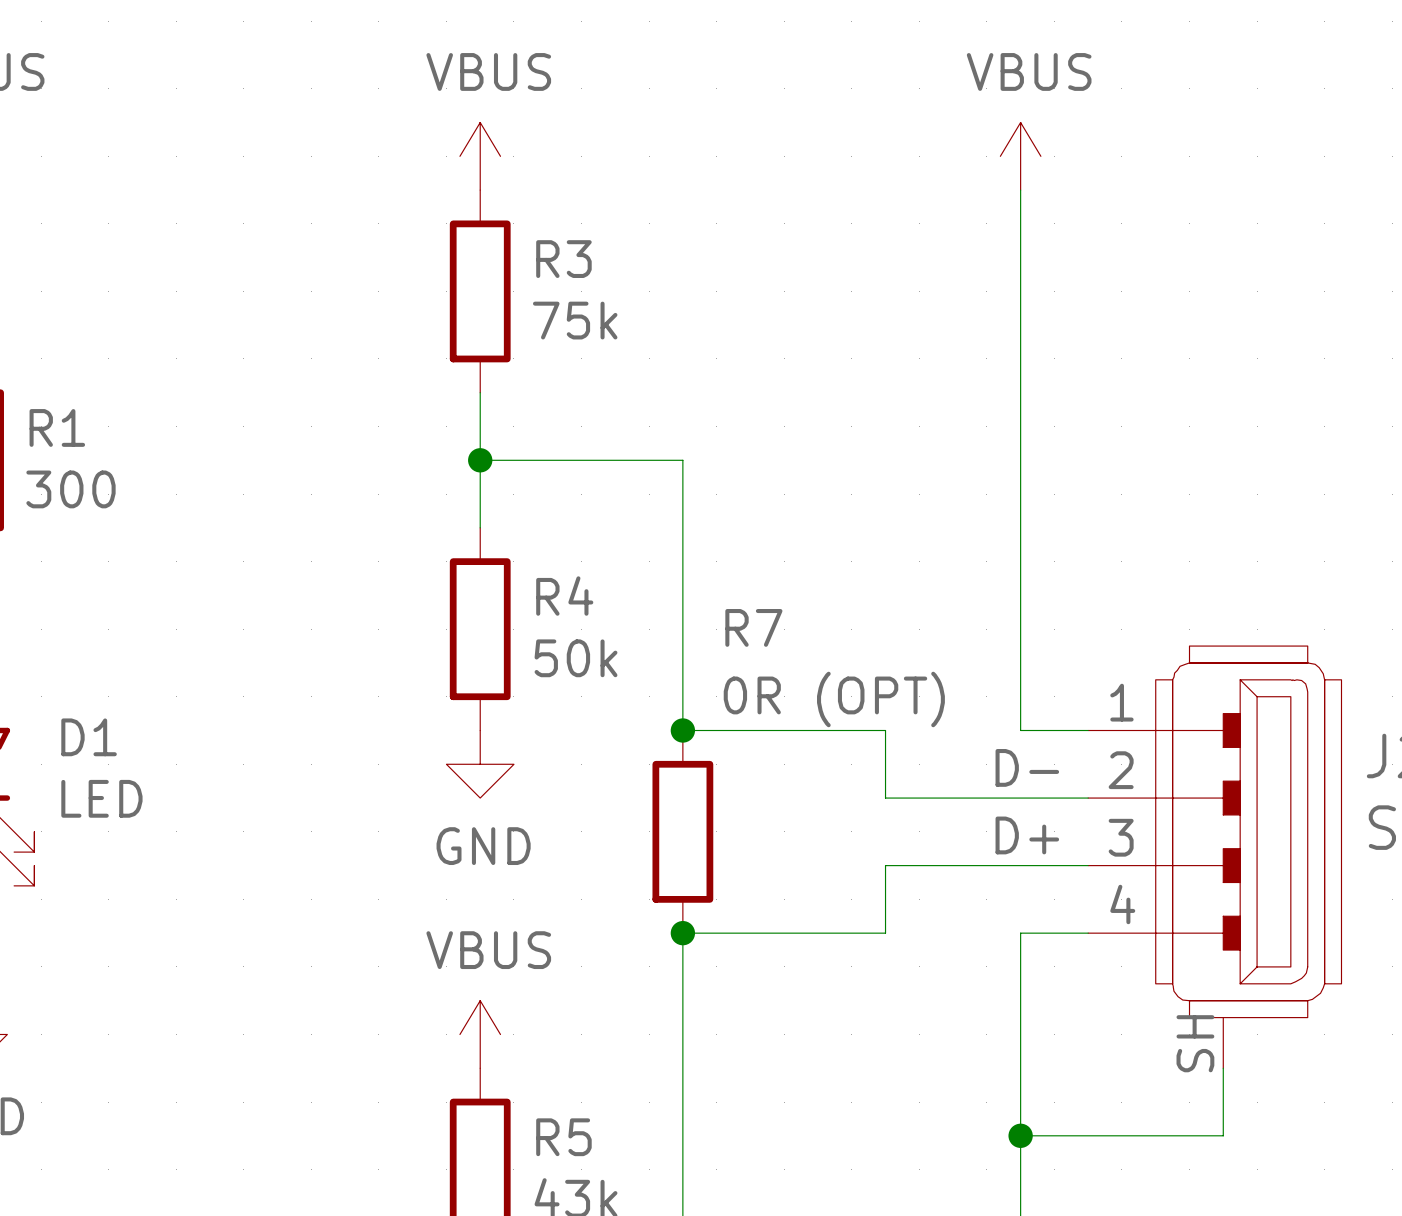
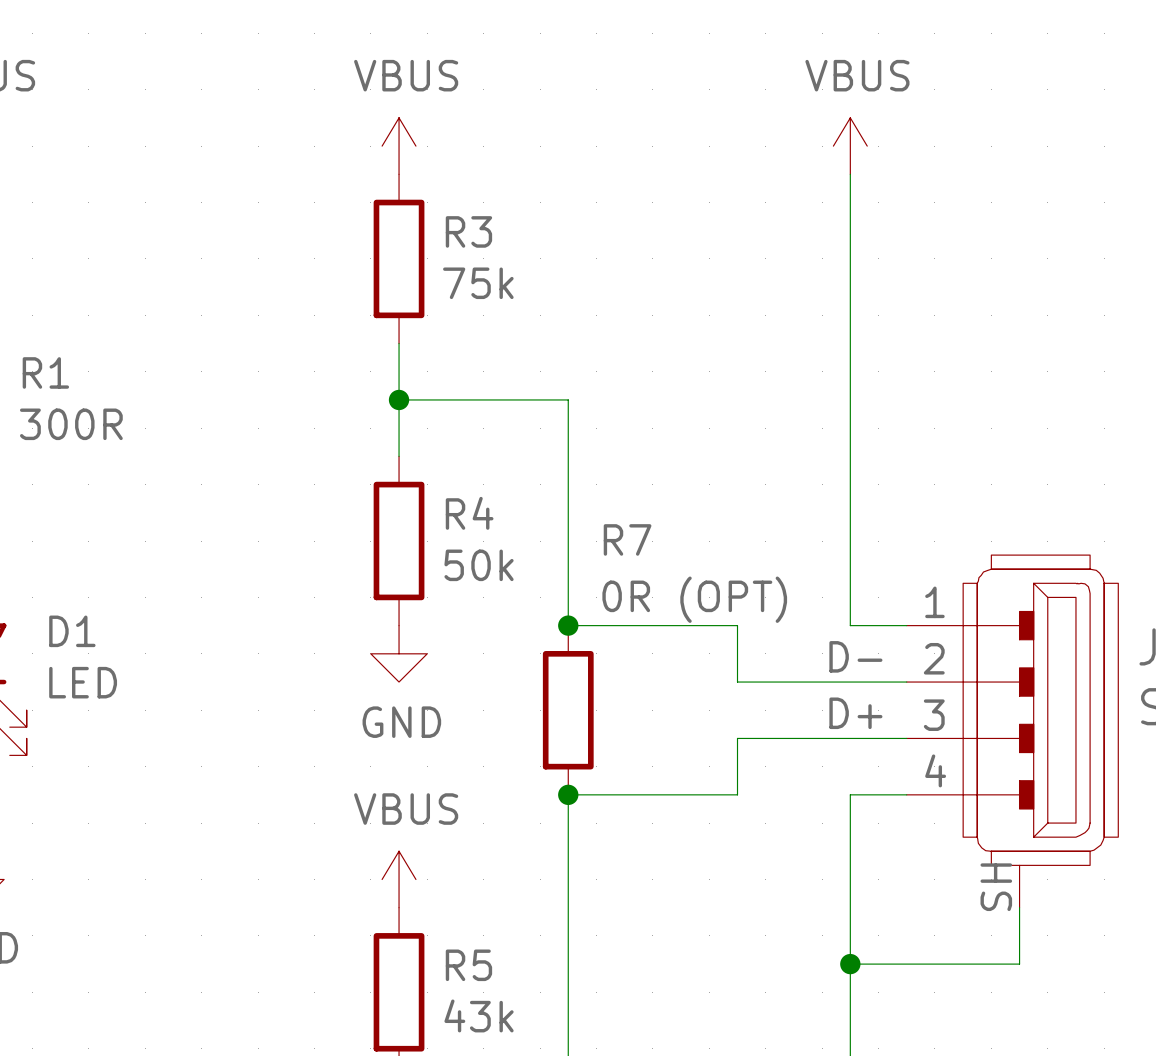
R1 value: 300 (70, 489) -> 300R (71, 424)

